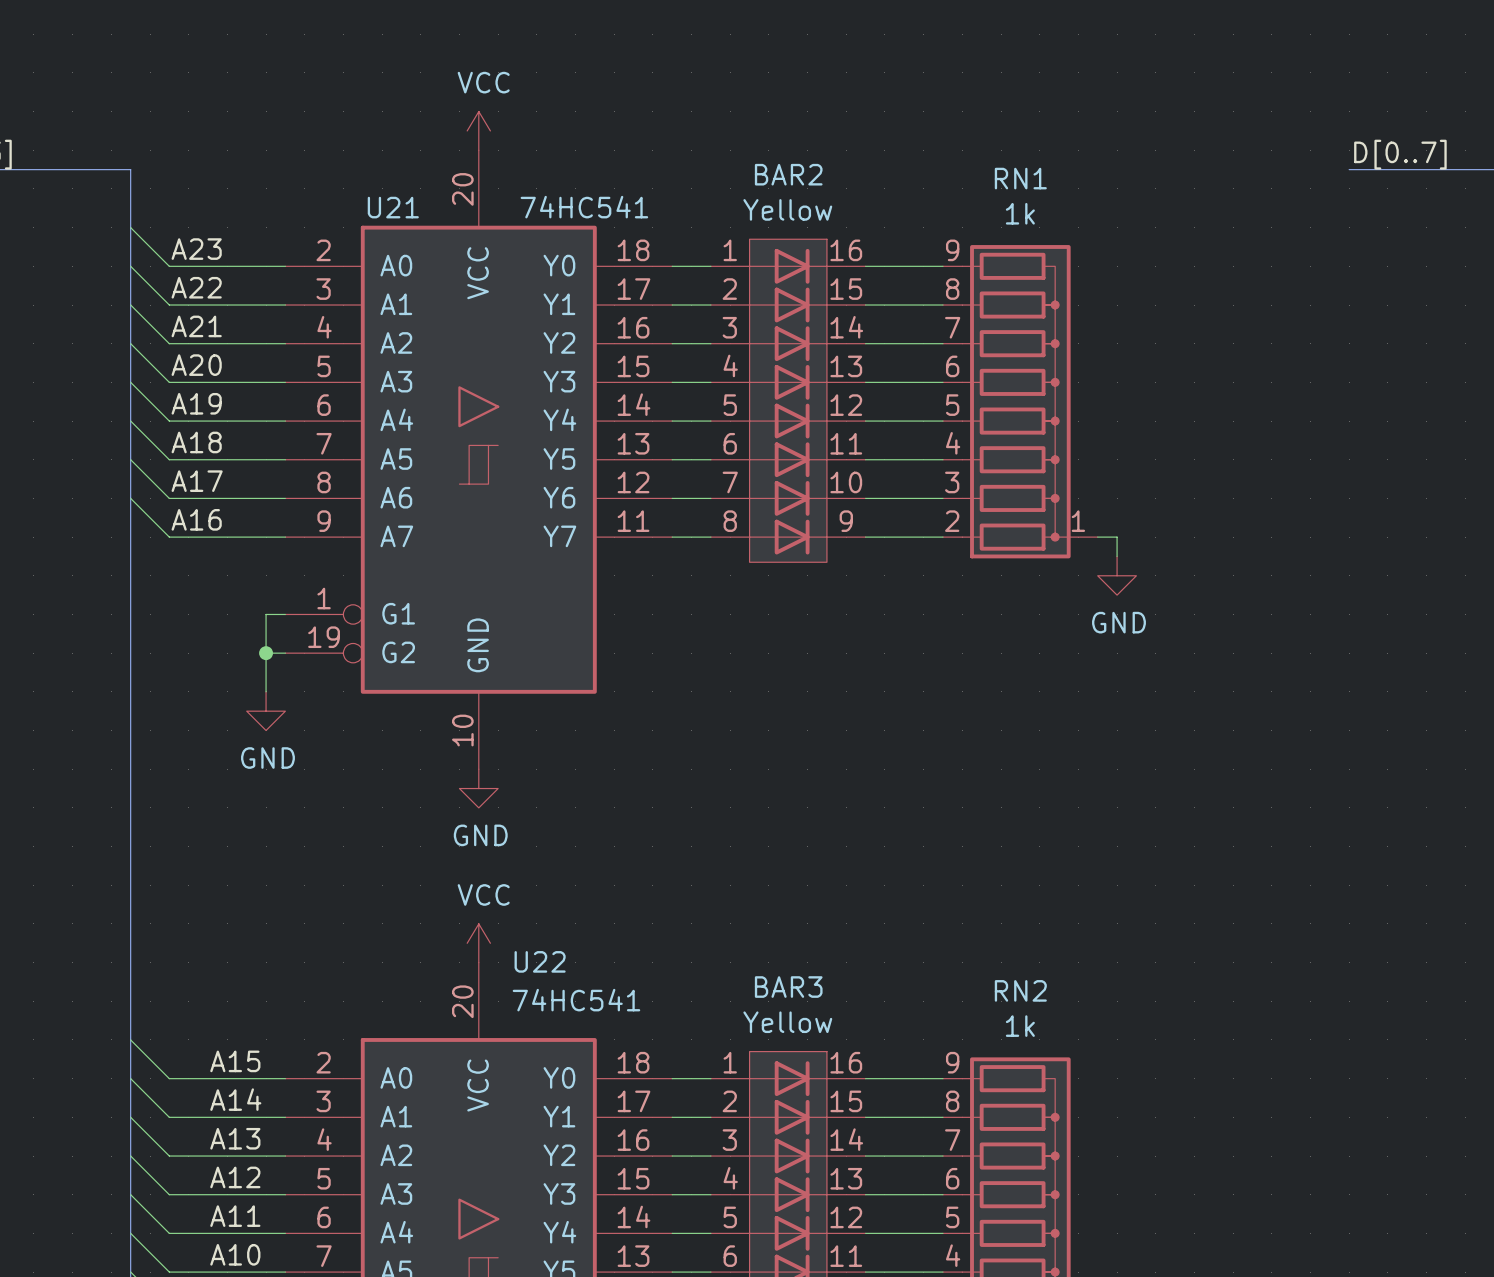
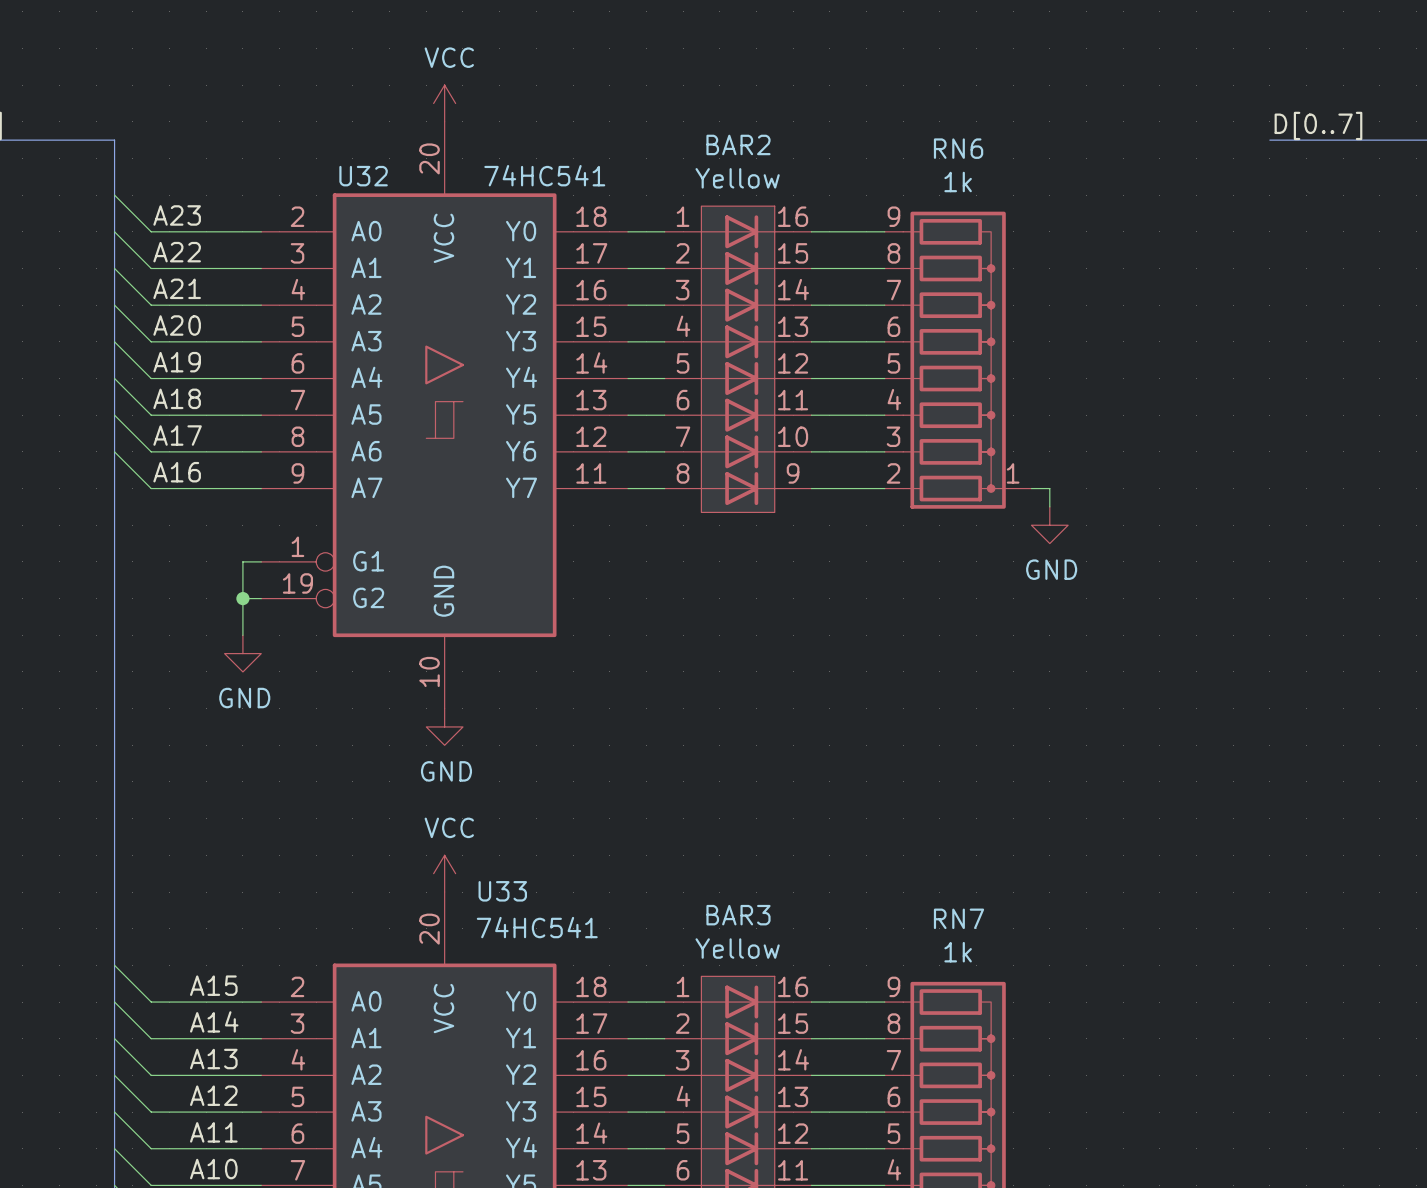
RN1 name: RN1 (1020, 178) -> RN6 (958, 148)
U21 name: U21 (393, 207) -> U32 (363, 176)
U22 name: U22 (540, 961) -> U33 (502, 891)
RN2 name: RN2 (1020, 990) -> RN7 (958, 918)

